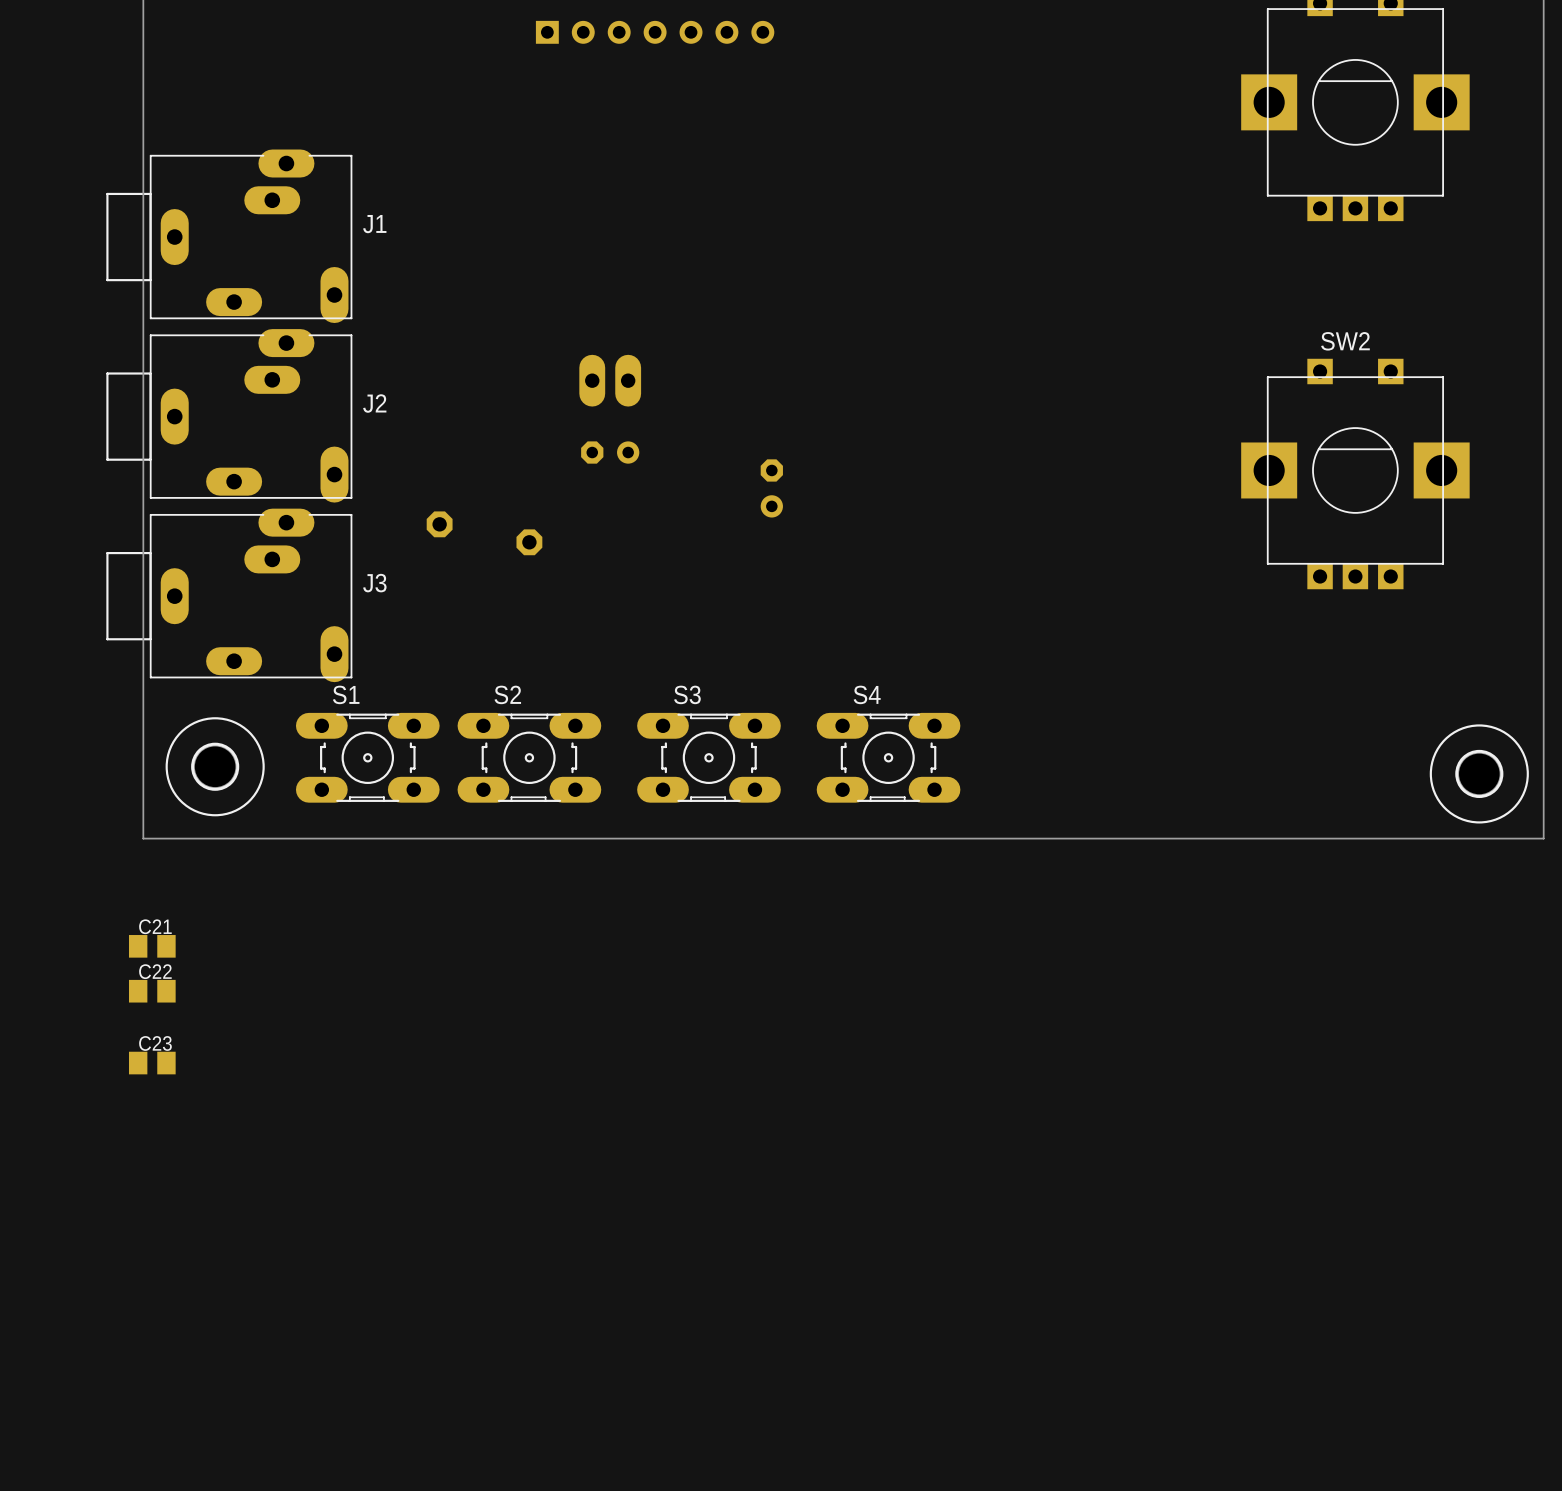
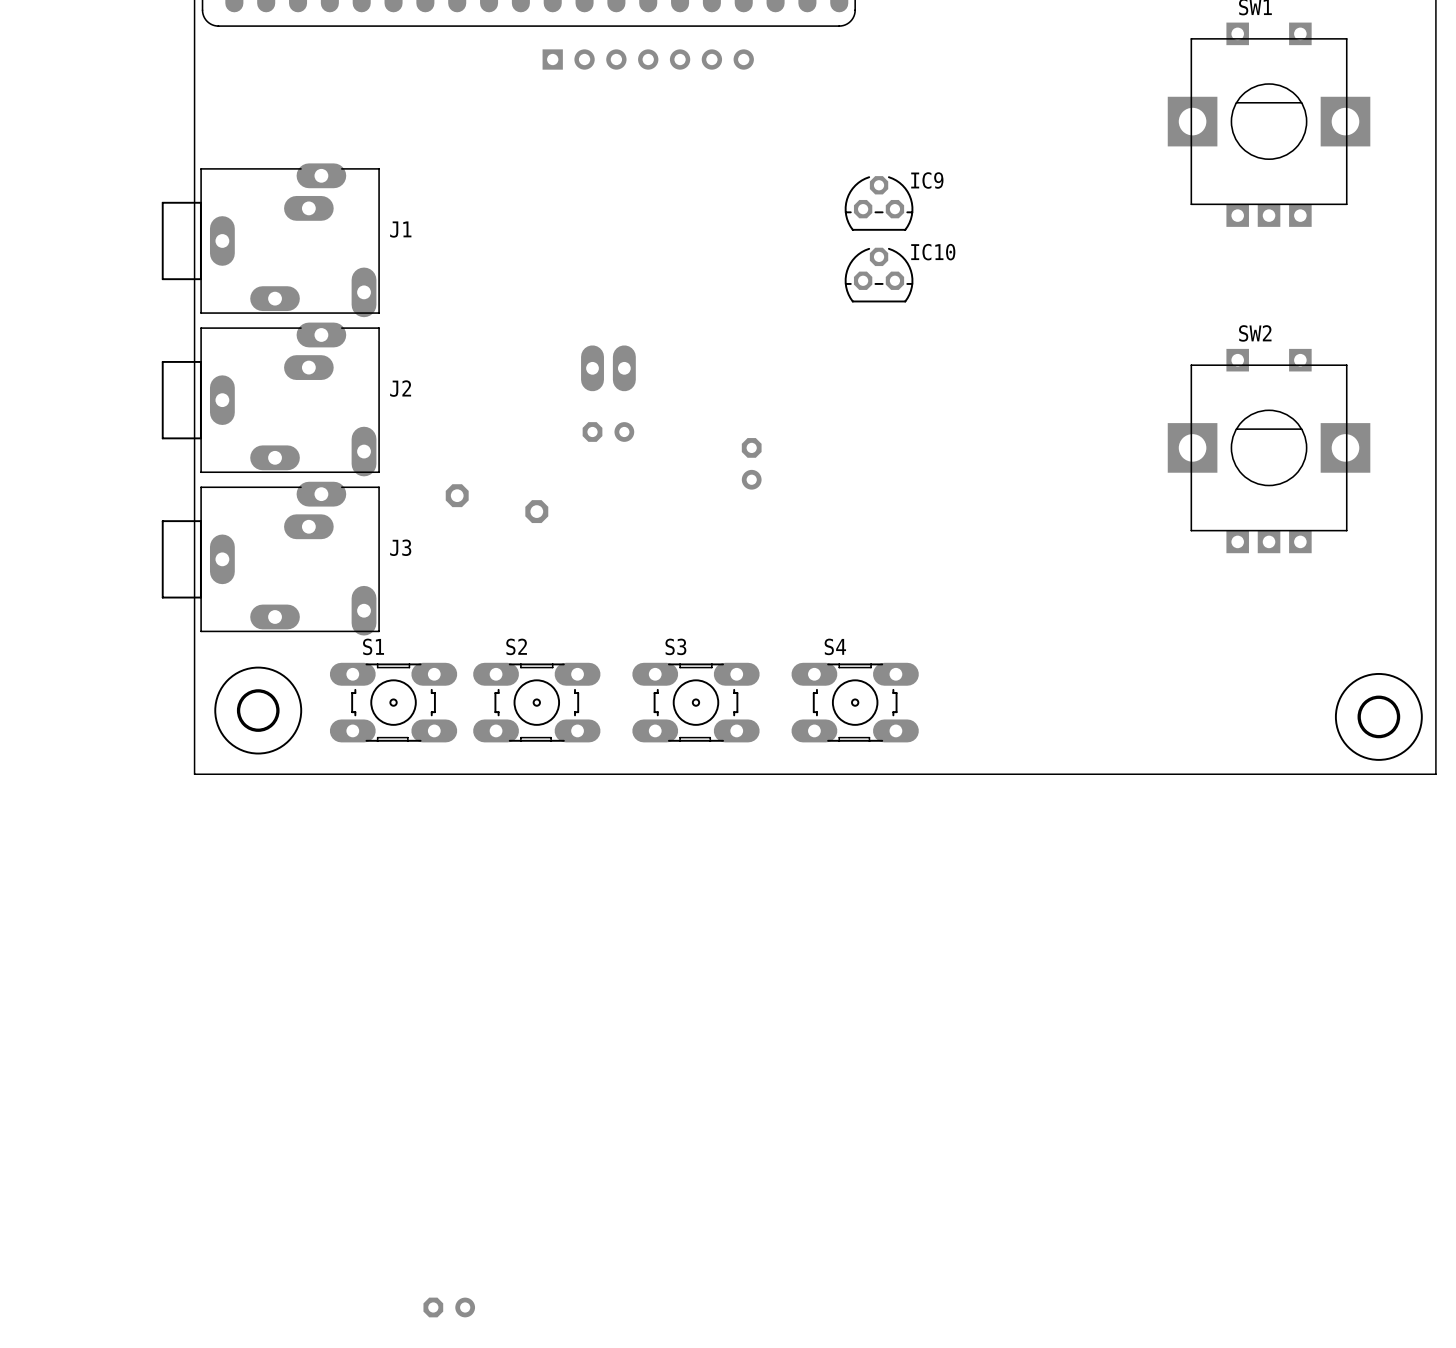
IC9: none -> (879, 203)
IC10: none -> (879, 275)
C21: (152, 946) -> none
C22: (152, 991) -> none
C23: (152, 1063) -> none
part: none -> (449, 1307)

